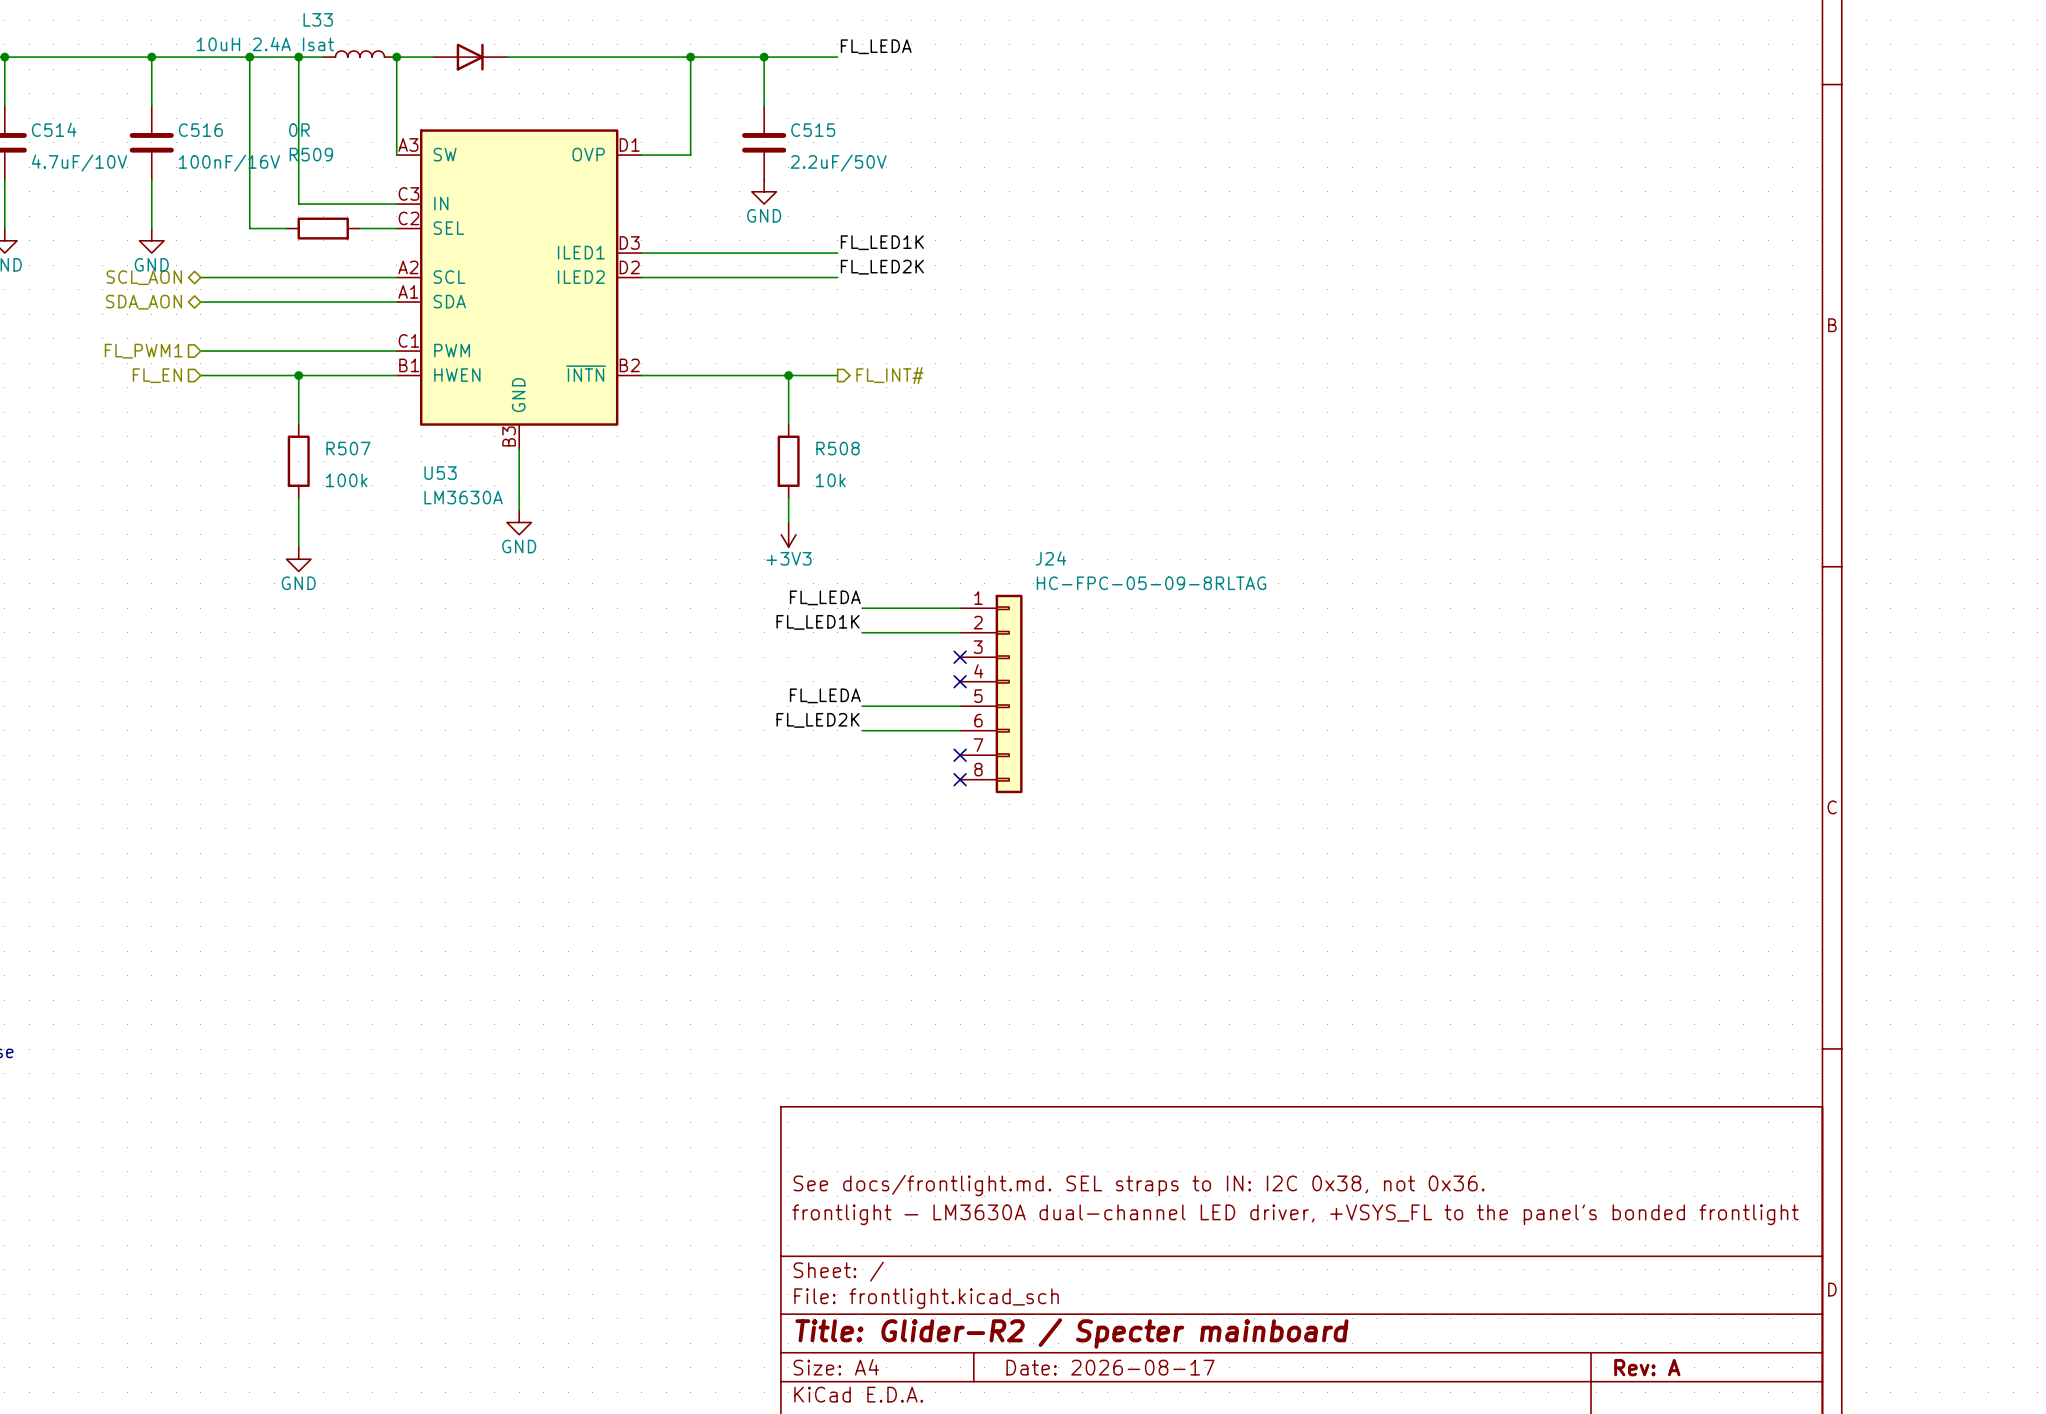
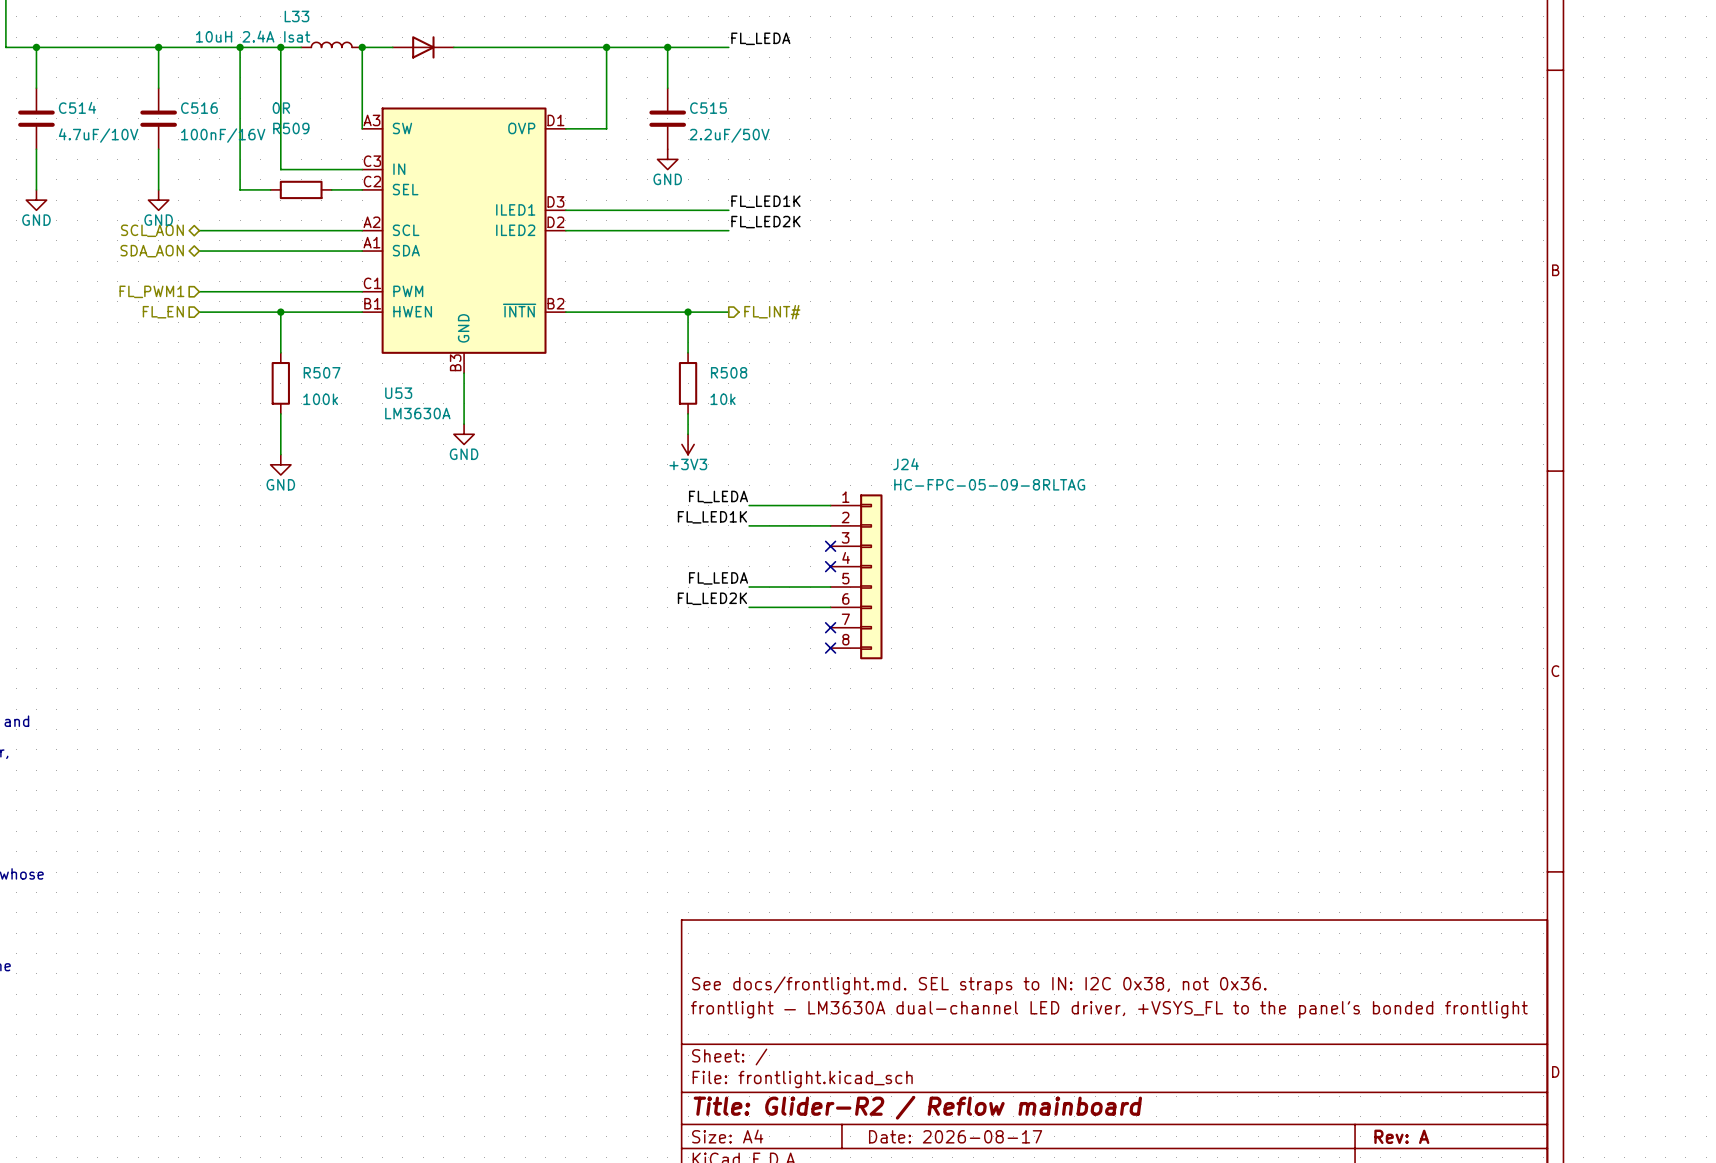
title block: Title: Glider-R2 / Specter mainboard (1071, 1333) -> Title: Glider-R2 / Reflow mainboard (917, 1107)

